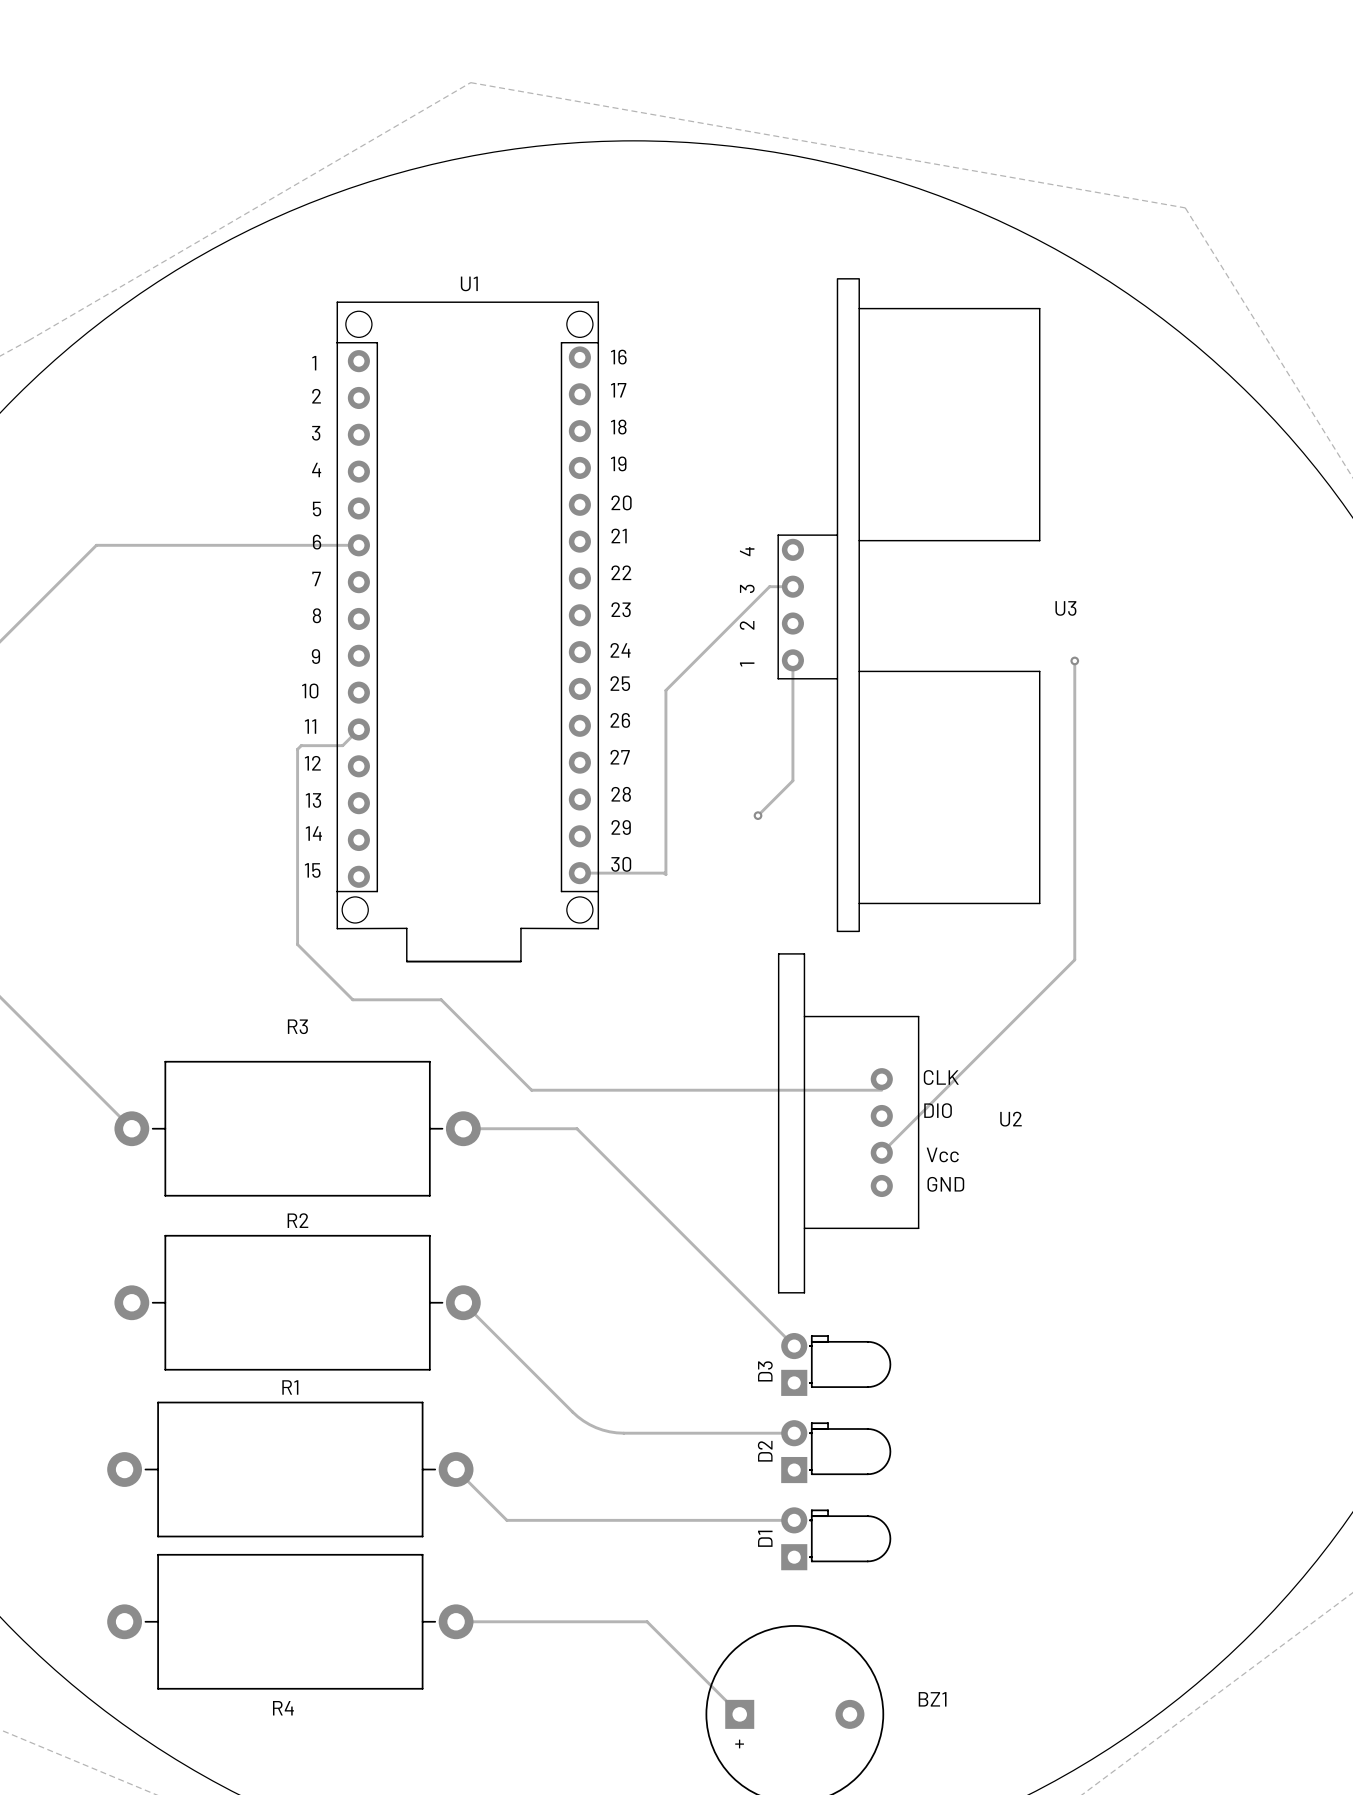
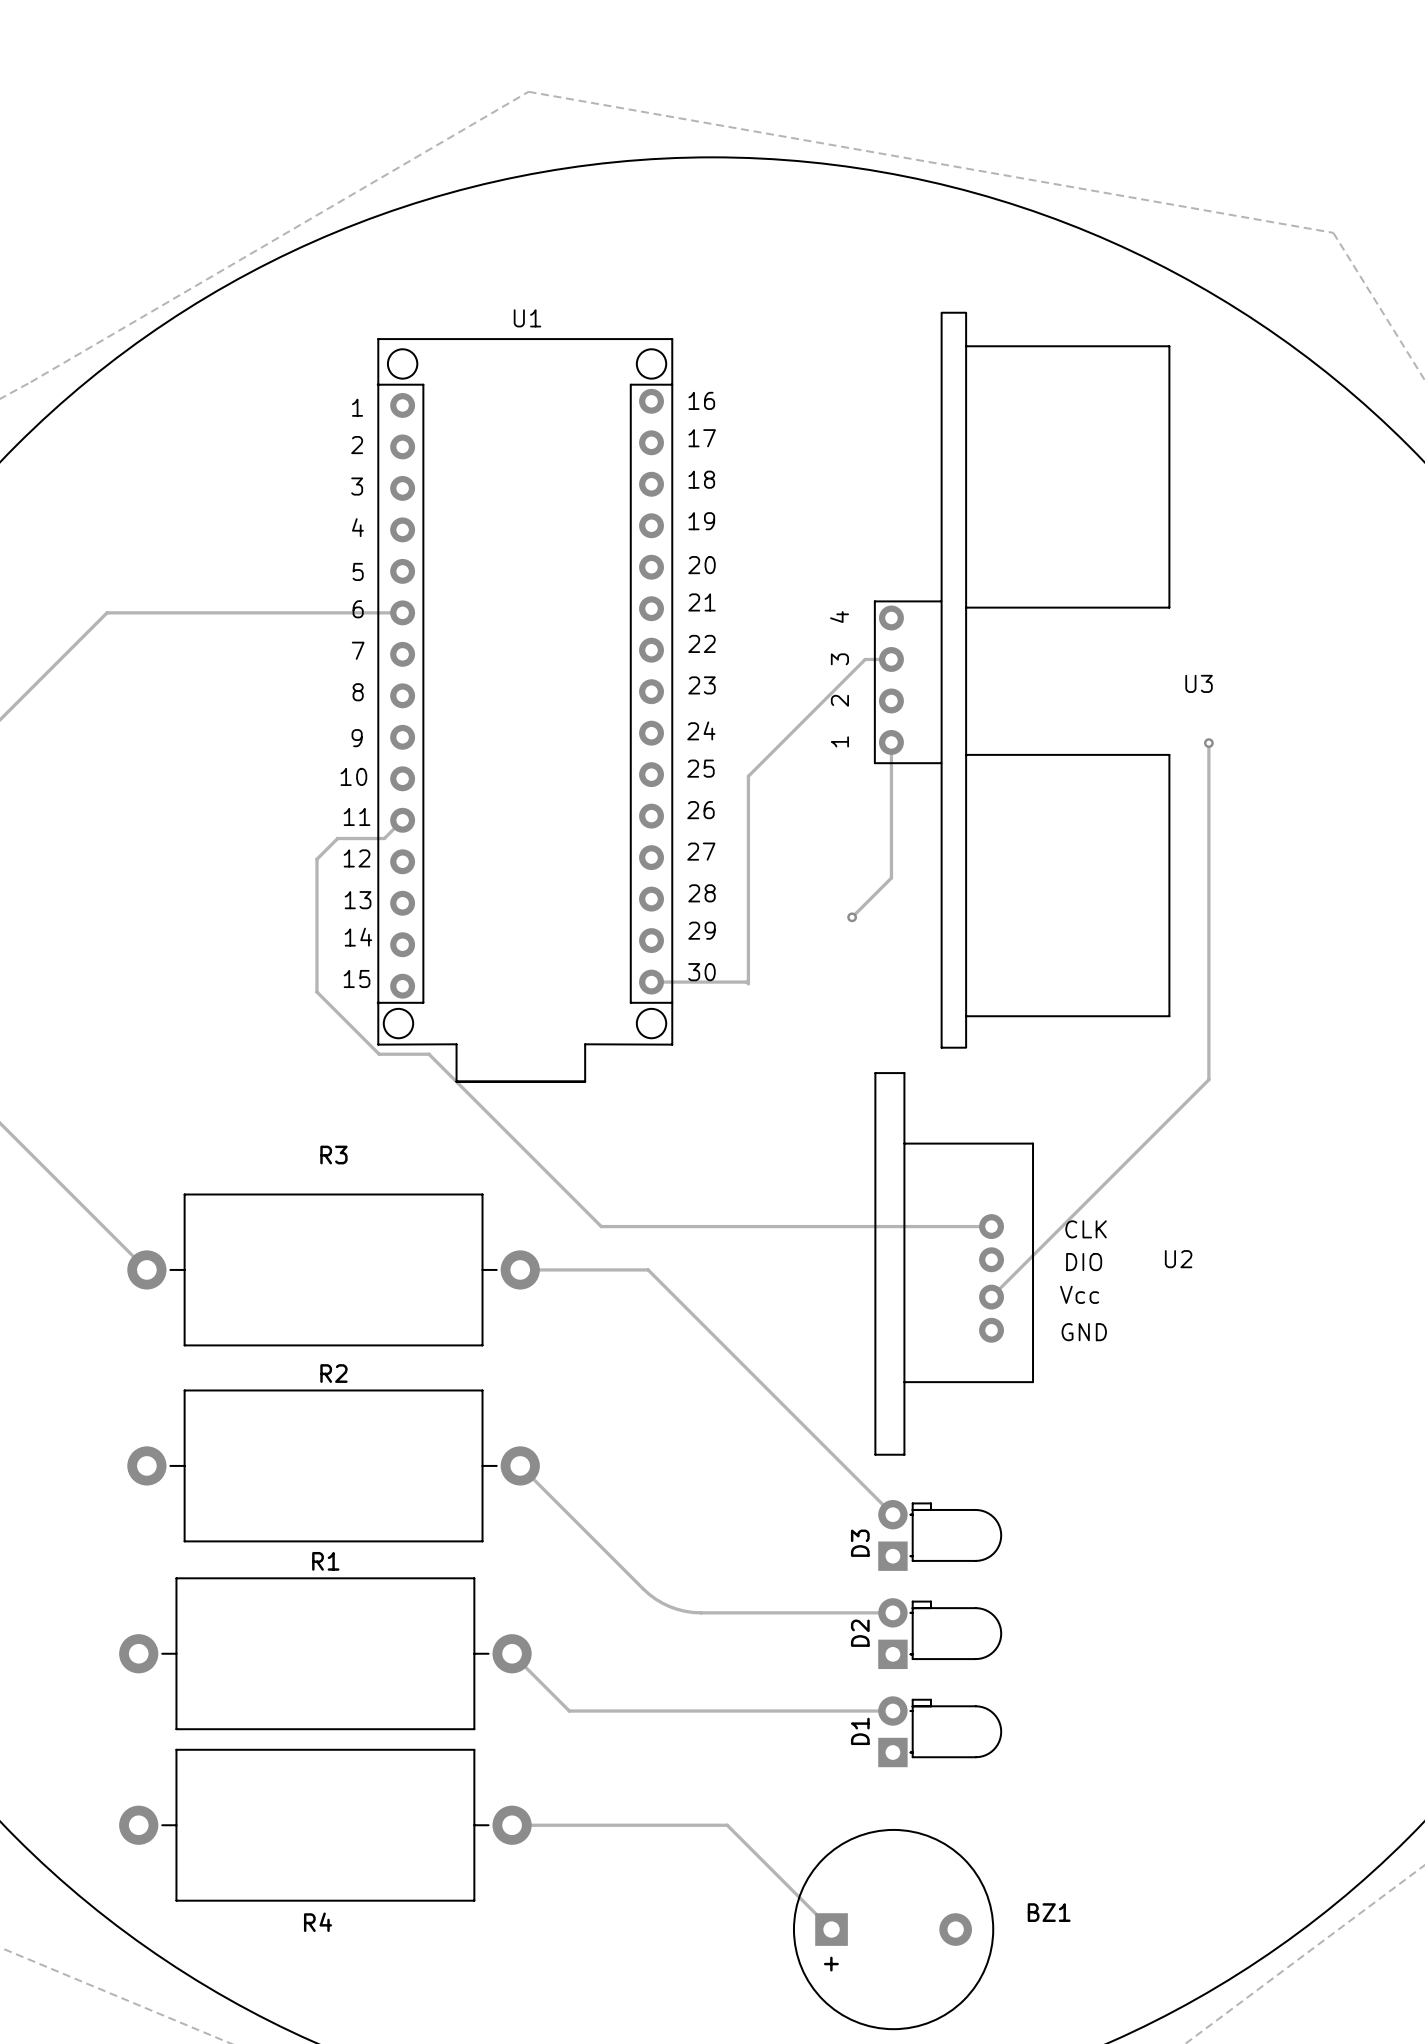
track: (297, 749) (297, 944) (352, 999) (441, 999) (531, 1090) (535, 1090) -> (333, 842) (316, 859) (316, 992) (379, 1054) (428, 1054) (601, 1226)
U2 footprint: [777, 953, 920, 1294] -> [874, 1072, 1034, 1456]
U2 name position: U2 (1011, 1119) -> U2 (1178, 1259)

